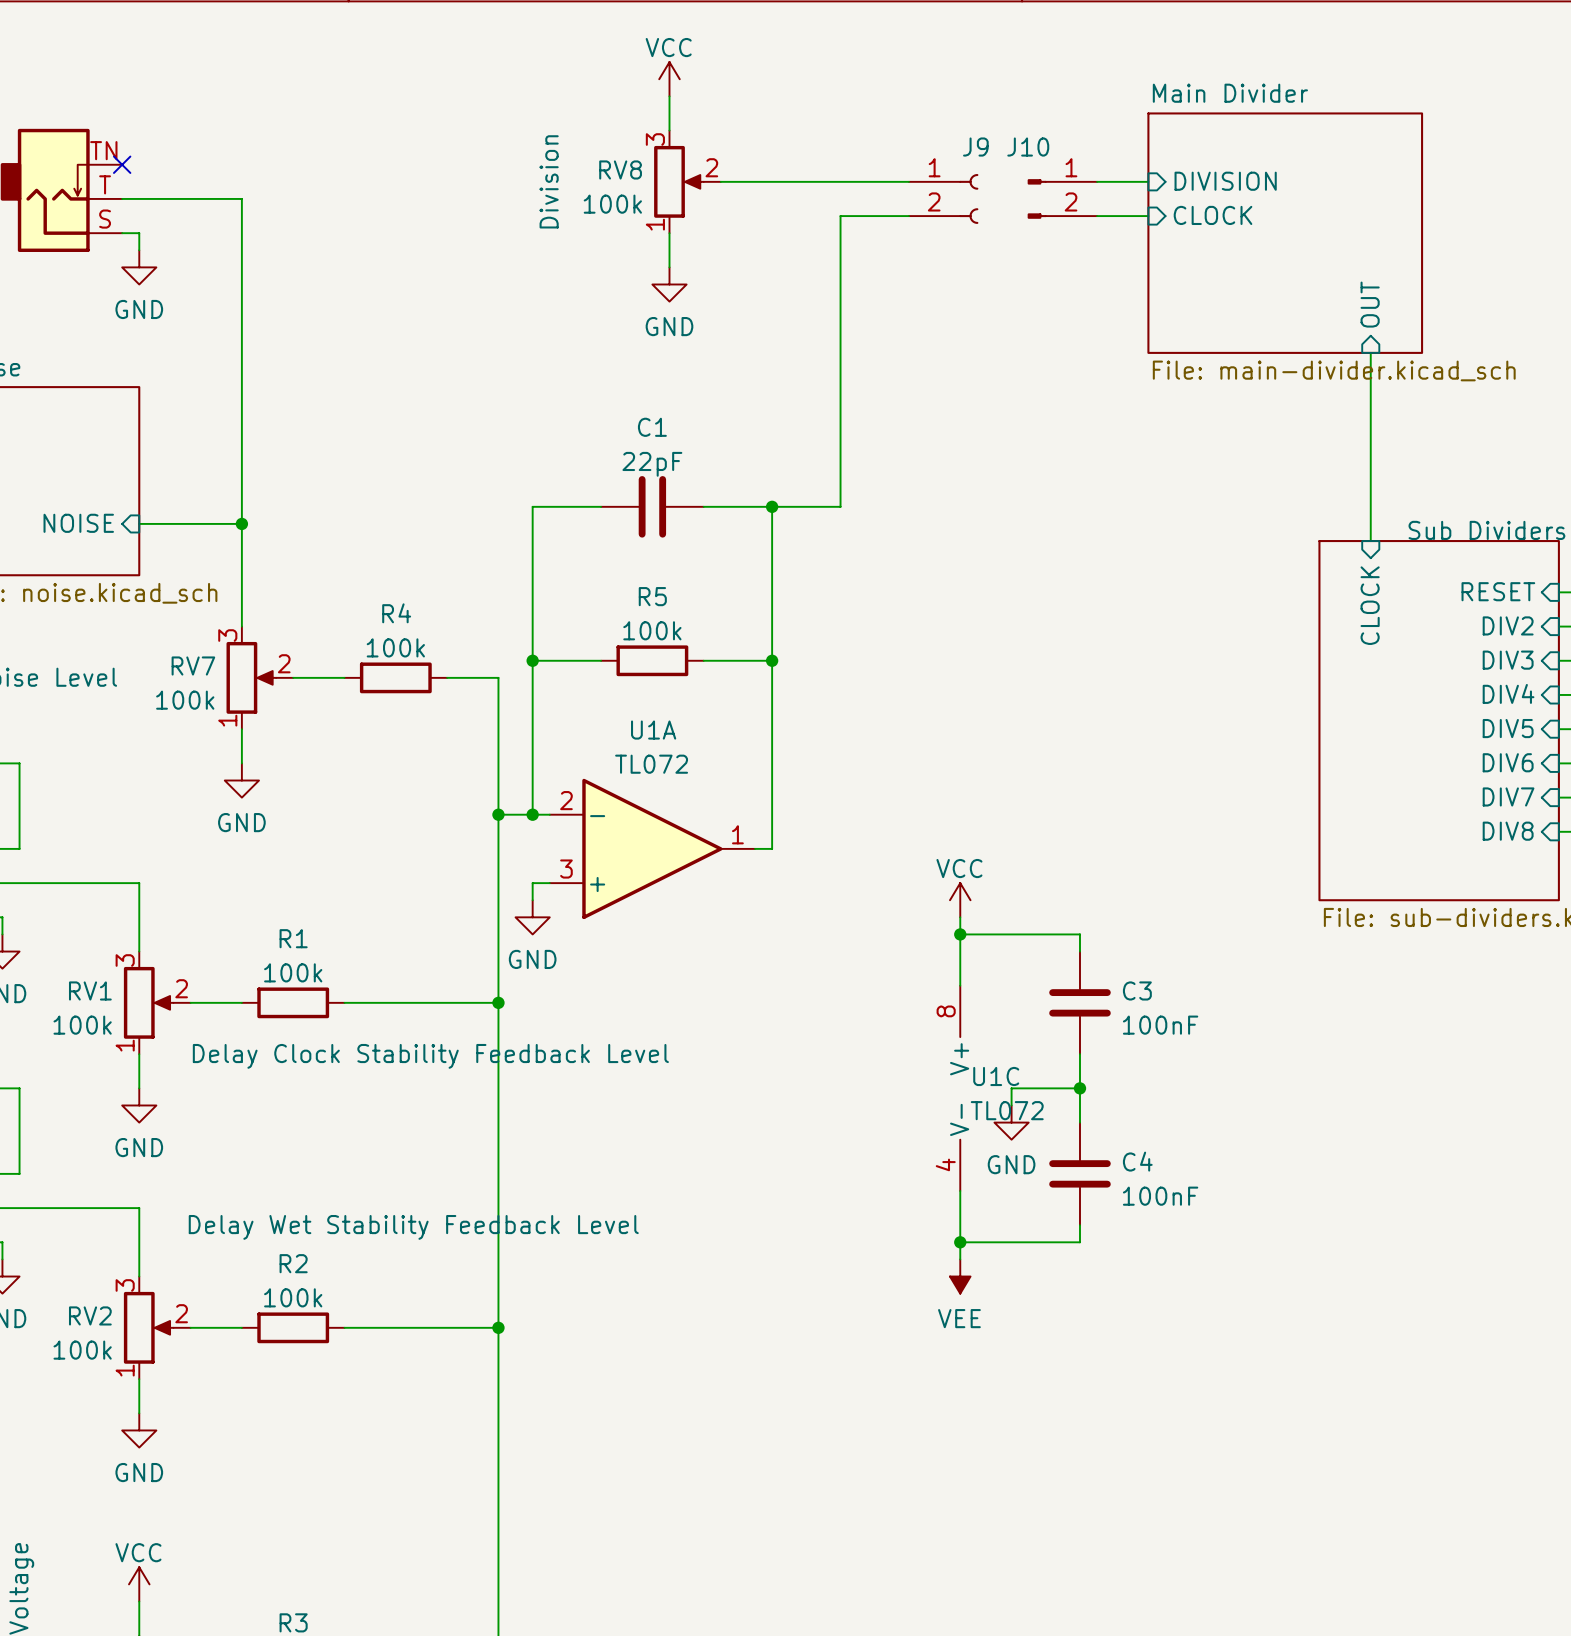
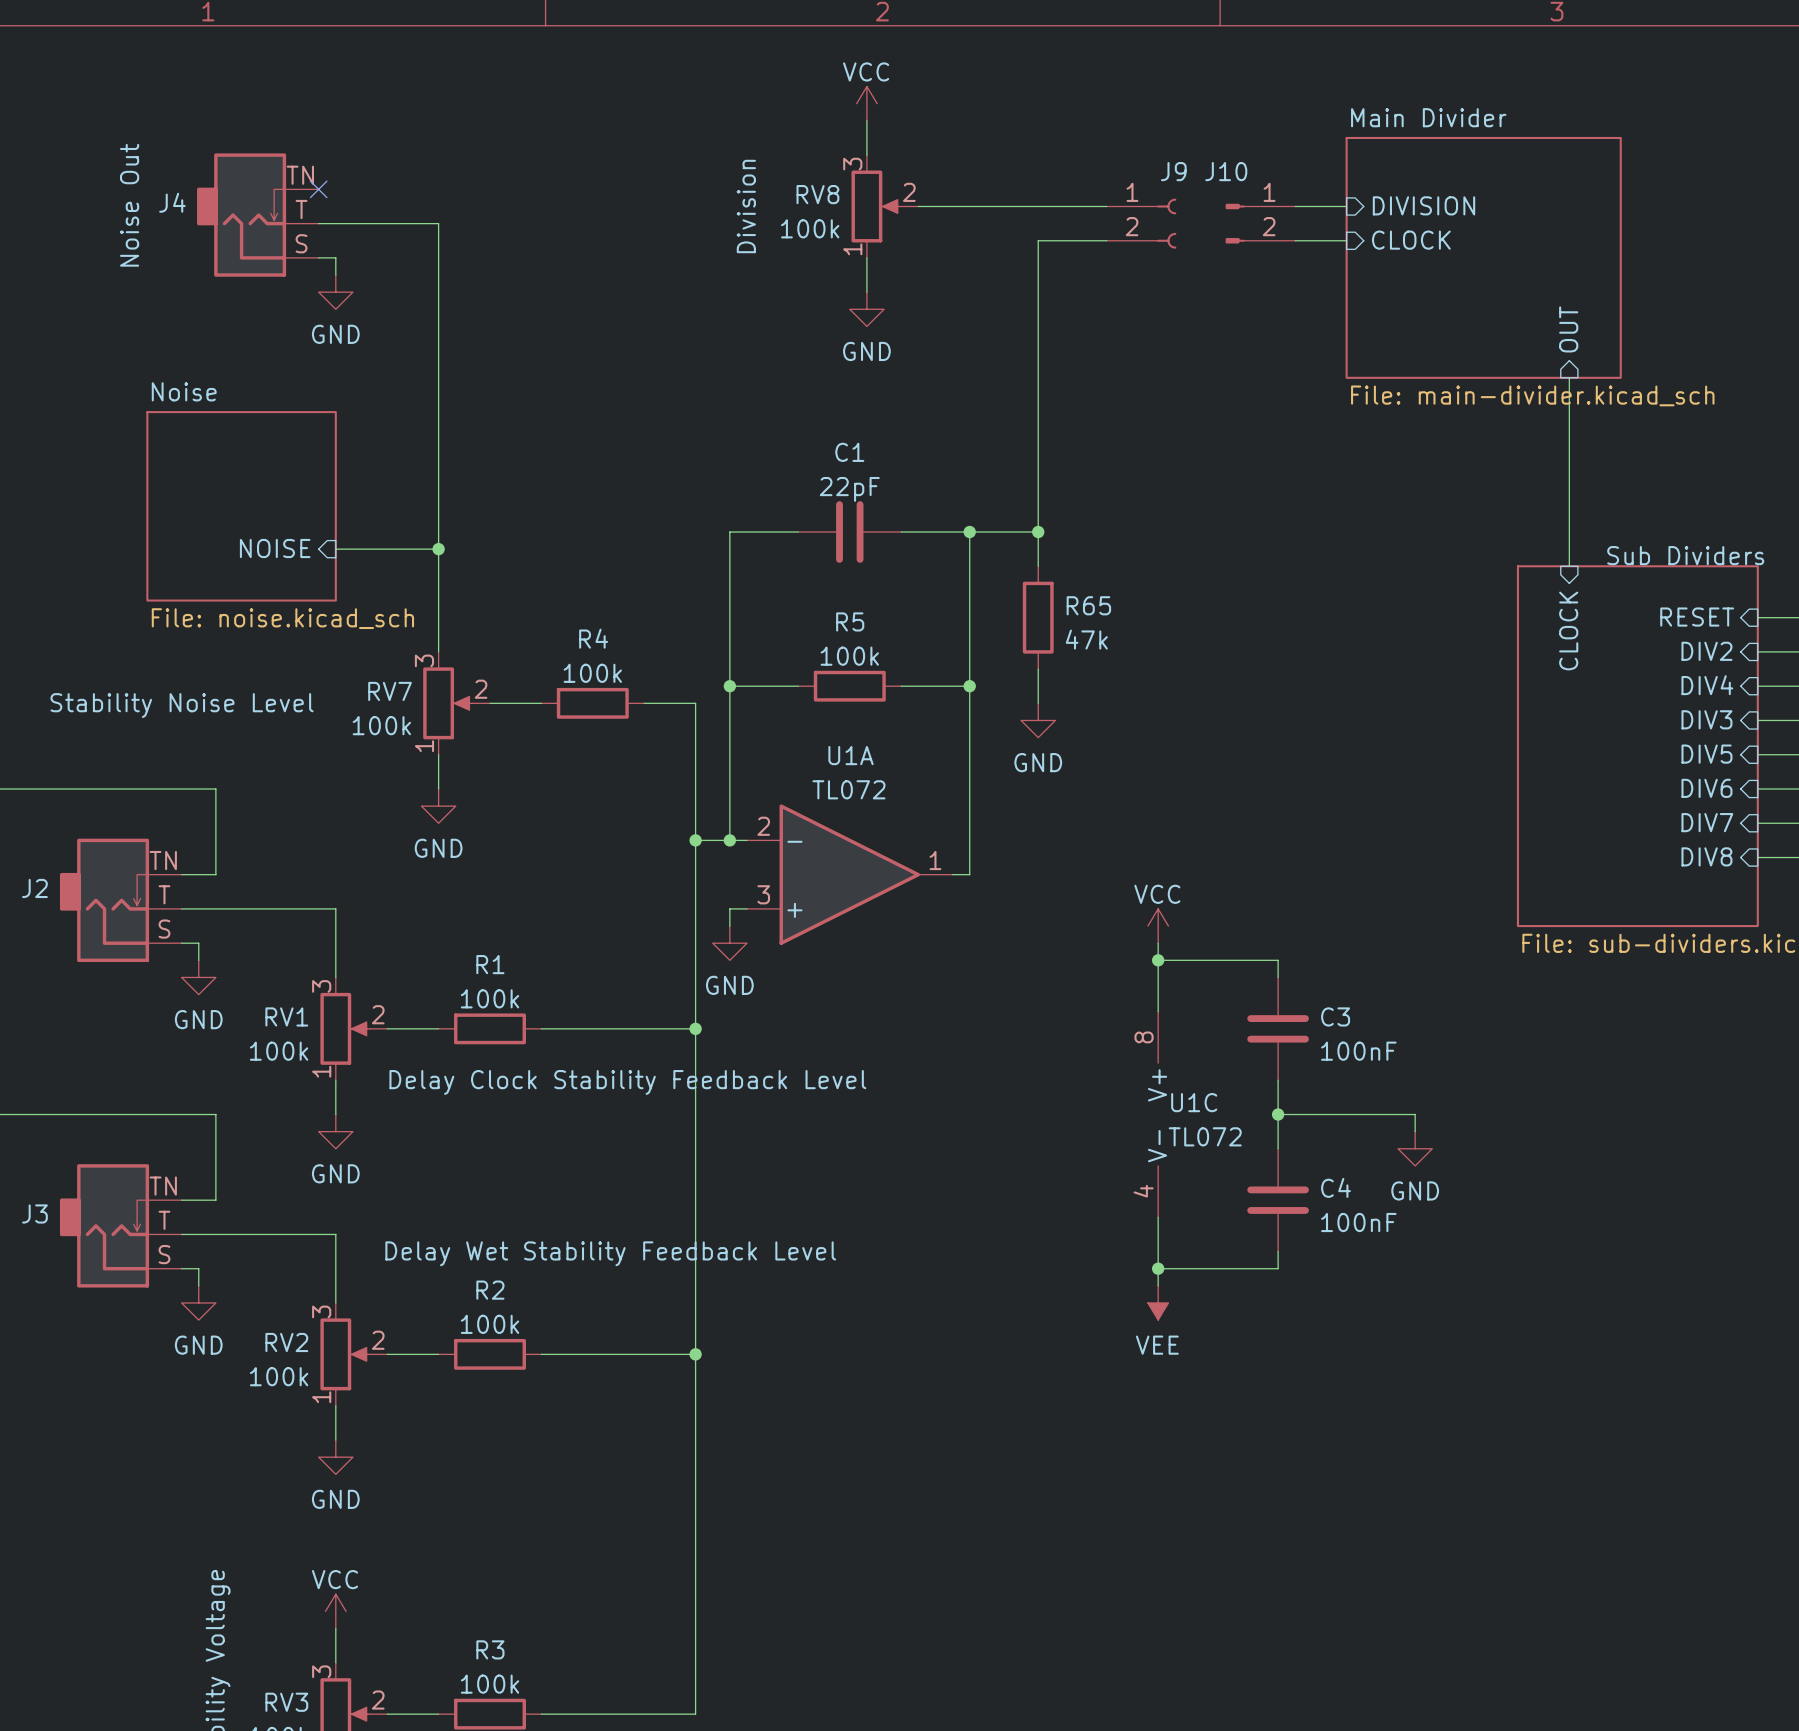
wire: none -> (1038, 532) (1038, 566)
junction: none -> (1038, 532)
R65: none -> 47k (1038, 617)
wire: none -> (1038, 669) (1038, 703)
sheet pin: DIV3 (1508, 660) -> DIV4 (1707, 685)
sheet pin: DIV4 (1508, 693) -> DIV3 (1706, 719)
power symbol: none -> GND (1038, 720)
wire: (1079, 1088) (1011, 1088) (1011, 1105) -> (1278, 1114) (1415, 1114) (1415, 1131)
power symbol position: GND (1011, 1122) -> GND (1415, 1148)

